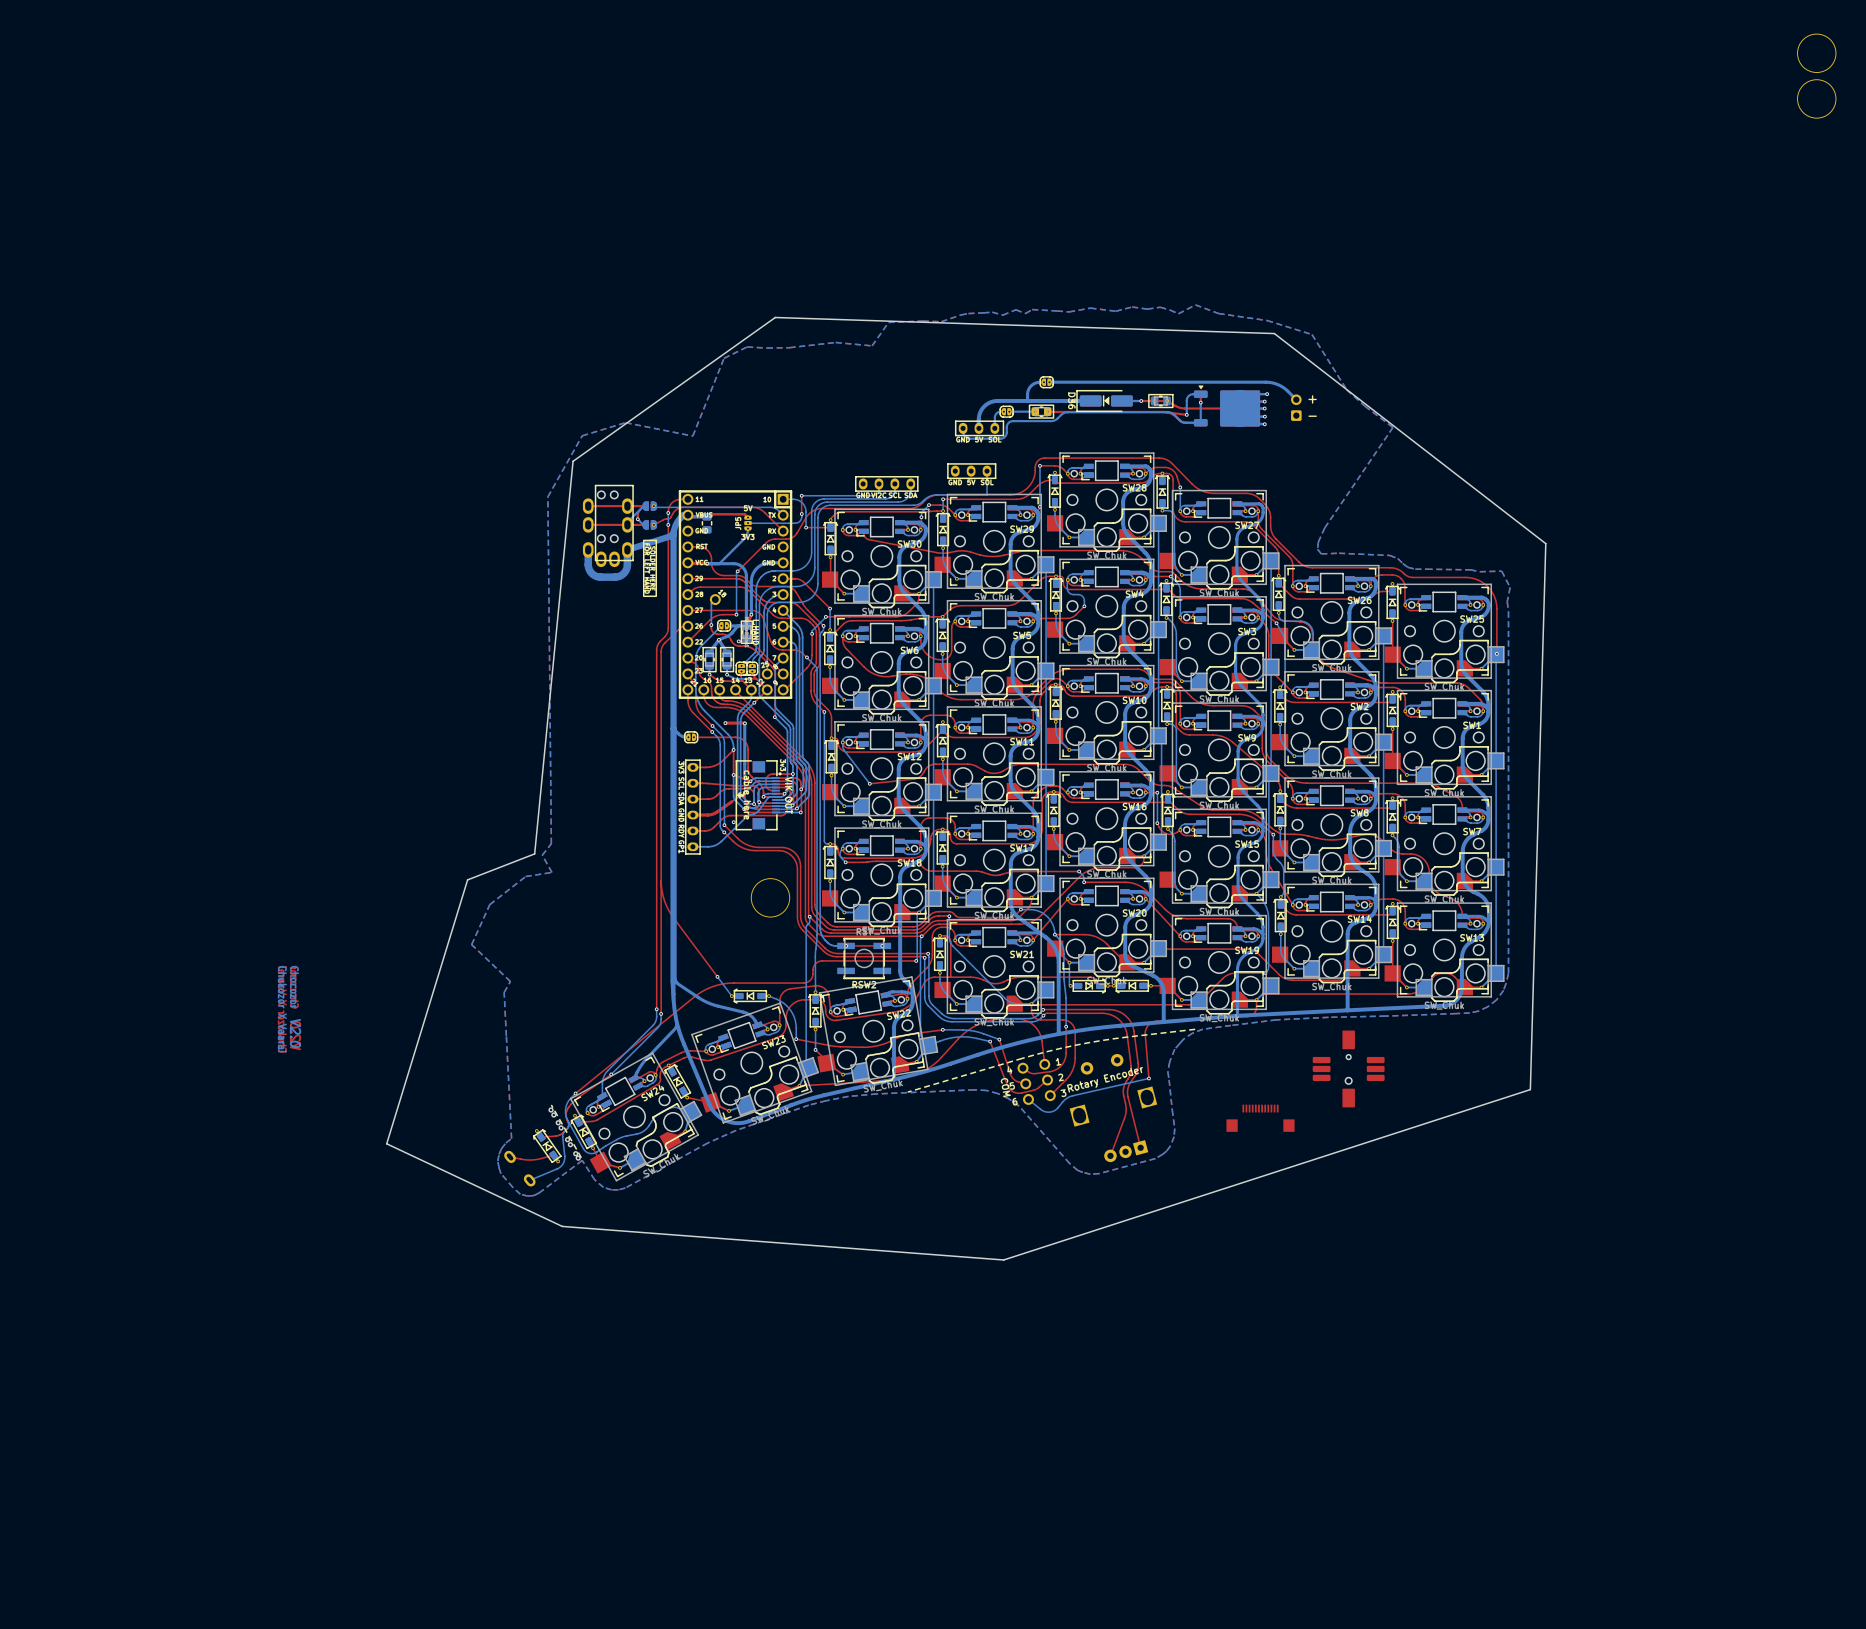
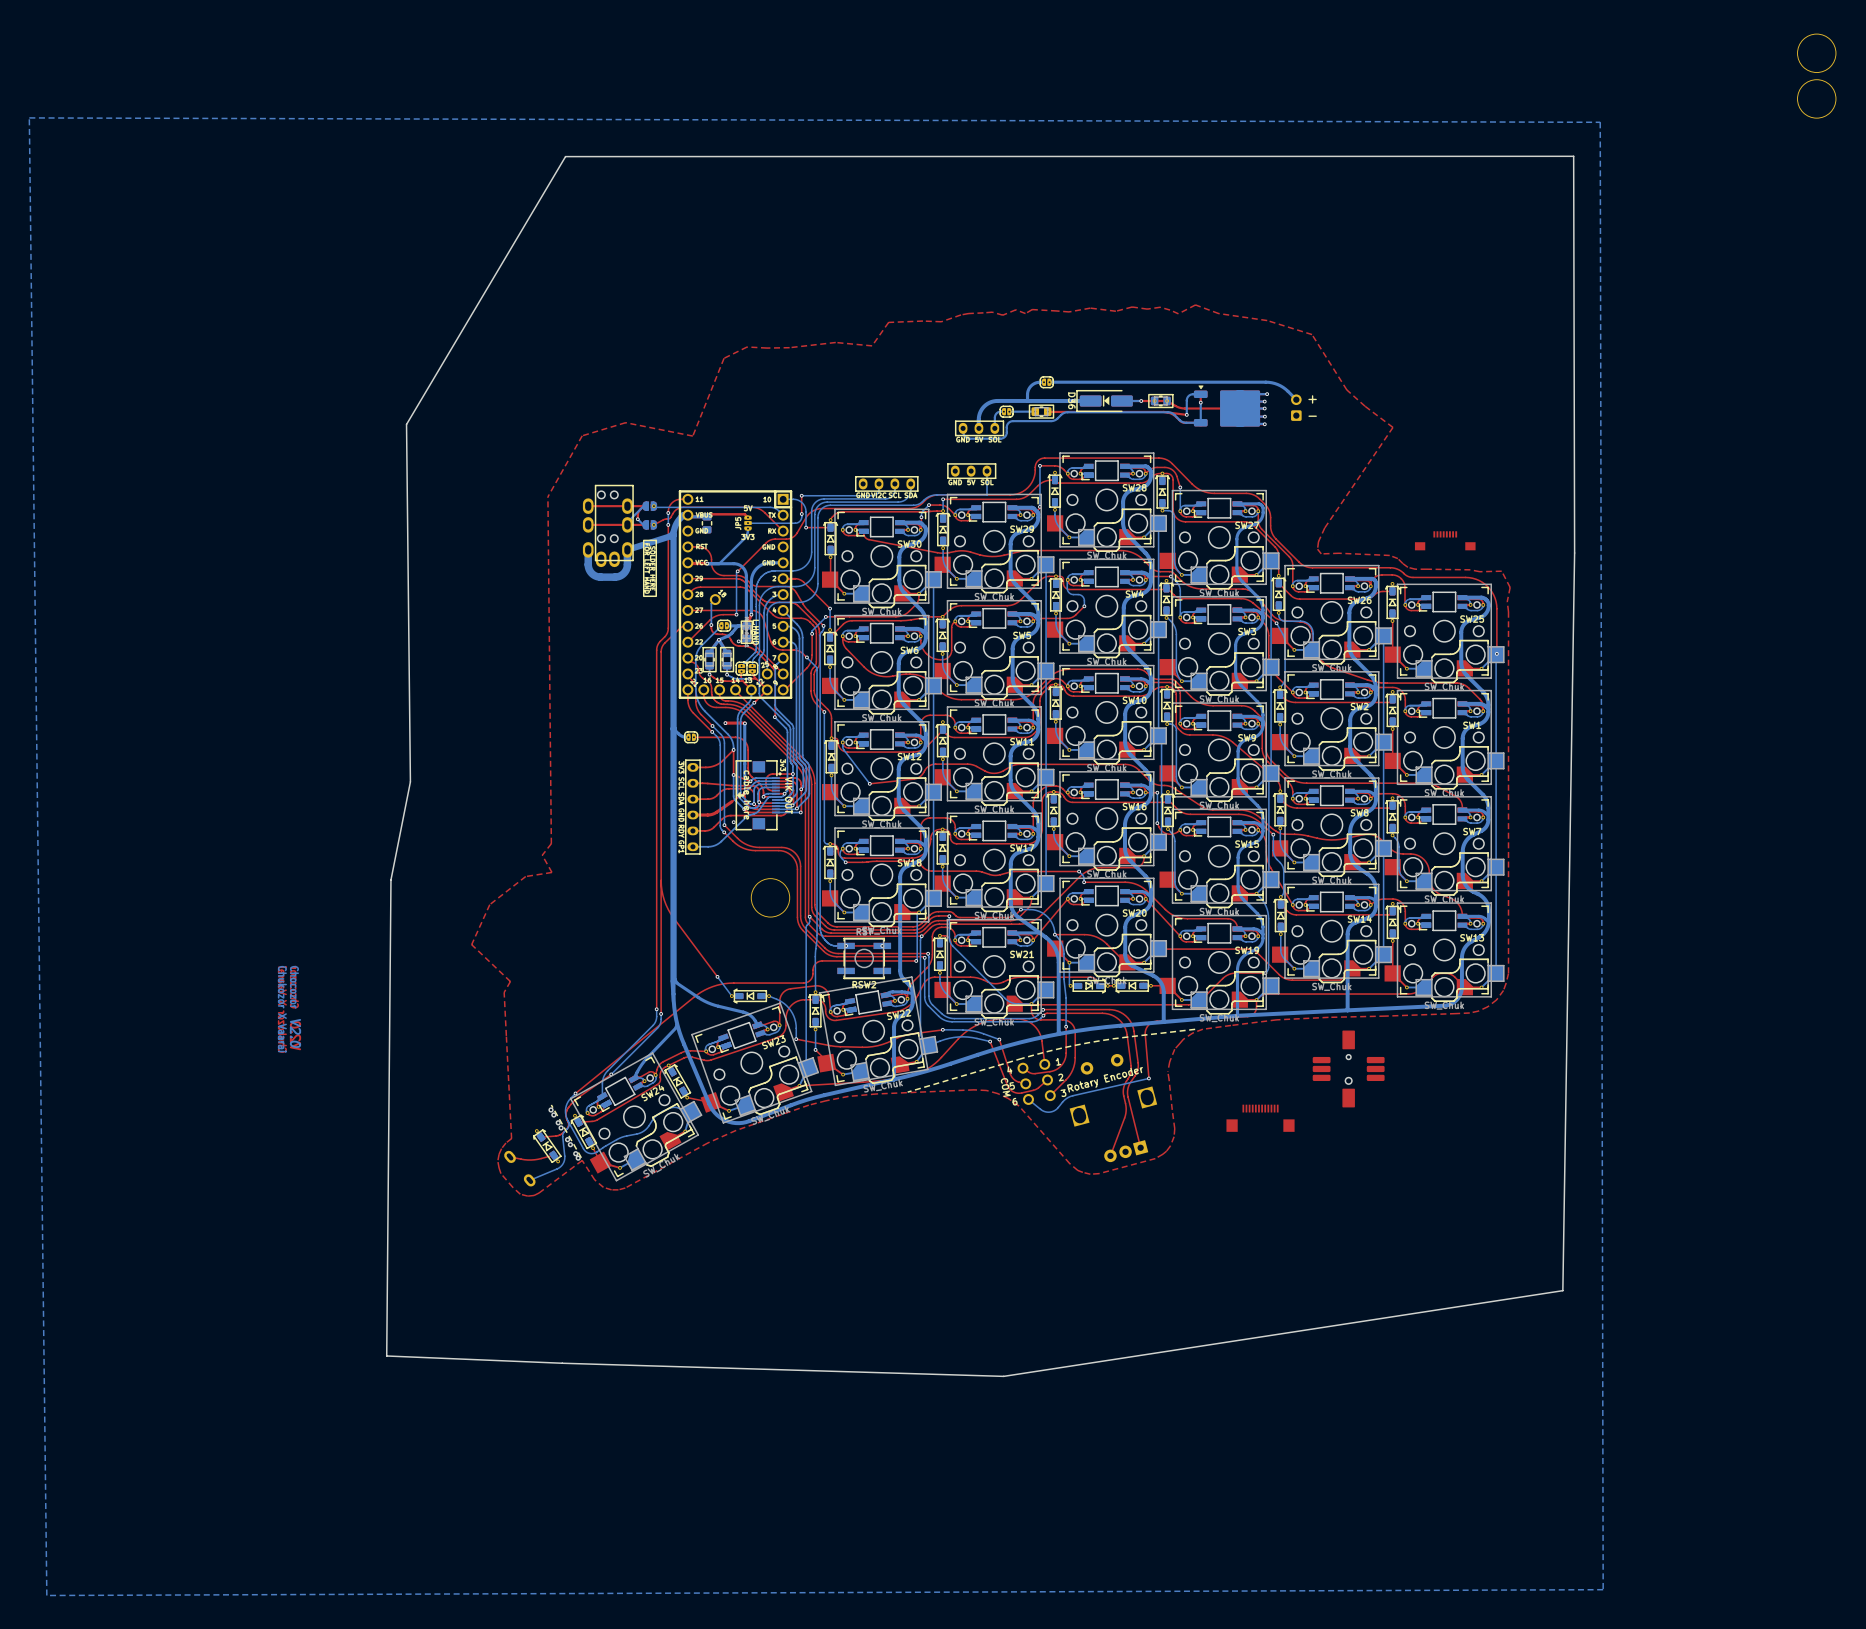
bottom zone outline: none -> (29, 117) (46, 1595) (1603, 1589) (1600, 122) (29, 117)
bottom zone outline: (1195, 304) (1178, 313) (1160, 307) (1147, 309) (1132, 307) (1115, 311) (1090, 308) (1069, 311) (1032, 309) (1025, 313) (1015, 309) (1002, 315) (992, 312) (968, 313) (941, 321) (888, 322) (872, 345) (835, 342) (789, 347) (747, 347) (724, 358) (692, 436) (625, 422) (582, 435) (547, 496) (551, 843) (542, 855) (551, 872) (525, 876) (489, 904) (471, 944) (510, 981) (504, 992) (511, 1138) (501, 1148) (497, 1161) (500, 1173) (520, 1194) (527, 1196) (539, 1192) (582, 1160) (594, 1179) (603, 1187) (611, 1189) (625, 1187) (707, 1142) (735, 1130) (825, 1100) (876, 1093) (974, 1089) (986, 1090) (1008, 1098) (1019, 1106) (1077, 1170) (1090, 1174) (1099, 1173) (1155, 1158) (1170, 1146) (1174, 1128) (1167, 1071) (1169, 1061) (1174, 1049) (1183, 1039) (1192, 1032) (1202, 1029) (1276, 1019) (1469, 1012) (1487, 1006) (1496, 999) (1503, 990) (1508, 973) (1507, 601) (1510, 587) (1501, 571) (1415, 569) (1407, 567) (1397, 558) (1389, 555) (1321, 553) (1317, 549) (1318, 541) (1324, 527) (1392, 427) (1346, 389) (1312, 334) (1267, 320) (1218, 313) (1195, 304) -> none
board edge: (775, 317) (1274, 333) (1545, 543) (1530, 1089) (1003, 1259) (562, 1226) (386, 1143) (467, 879) (534, 853) (573, 461) (775, 317) -> (1573, 156) (1574, 553) (1562, 1290) (1003, 1376) (386, 1355) (390, 879) (410, 781) (406, 424) (565, 156) (1573, 156)
part: none -> (1445, 540)

